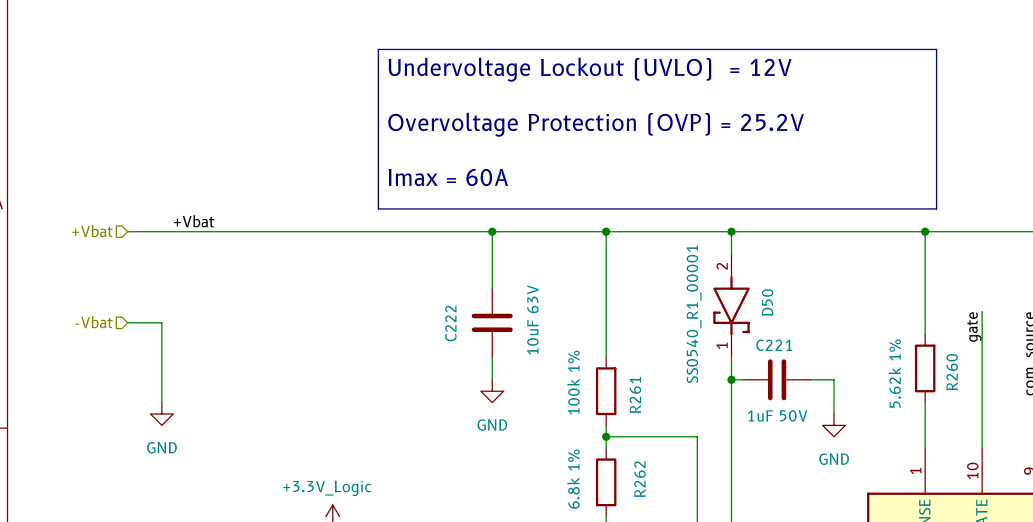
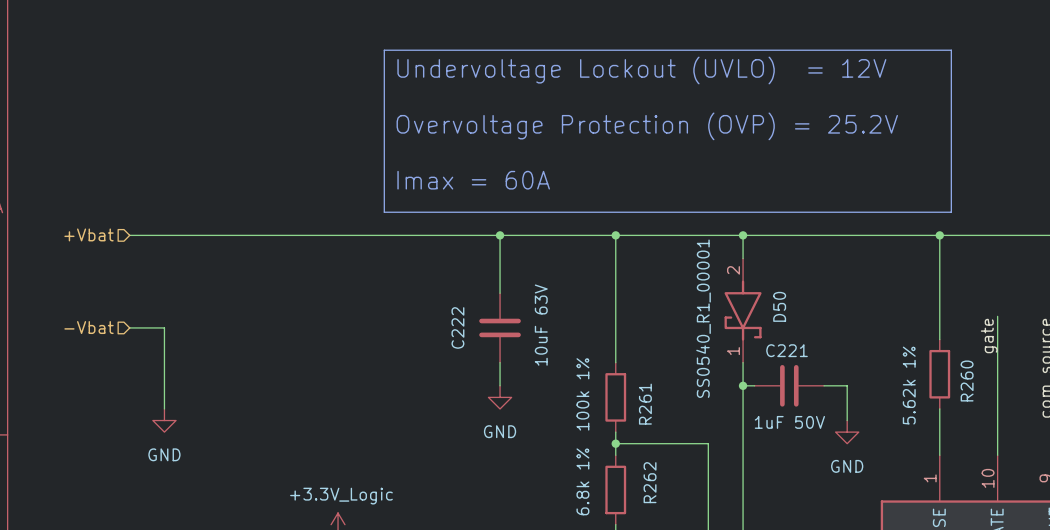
label: +Vbat (194, 221) -> none

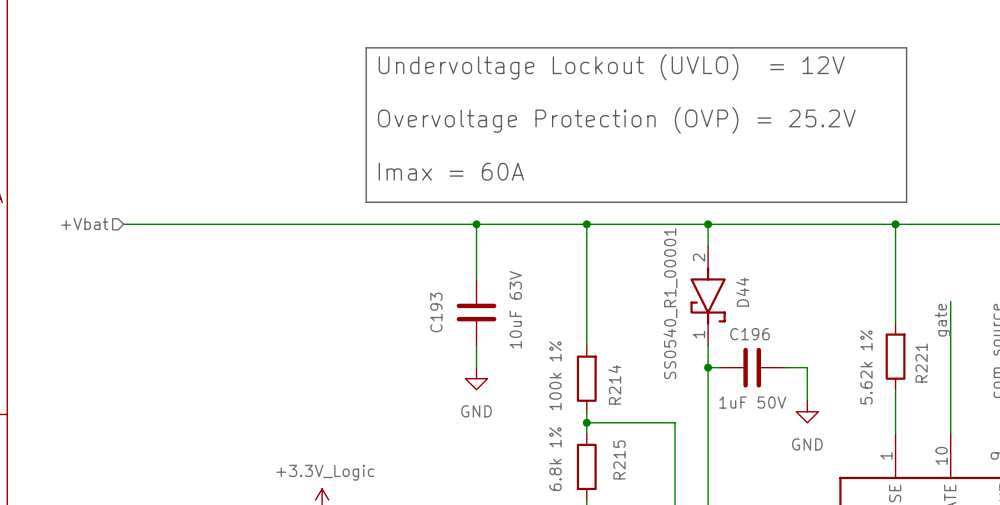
D50 name: D50 (779, 306) -> D44 (742, 292)
hierarchical label: -Vbat (89, 327) -> none
wire: (129, 327) (164, 327) (164, 408) -> none
C222 name: C222 (457, 327) -> C193 (436, 312)
C221 name: C221 (787, 350) -> C196 (749, 334)
R260 name: R260 (967, 381) -> R221 (921, 363)
R261 name: R261 (645, 404) -> R214 (614, 384)
power symbol: GND (164, 420) -> none
R262 name: R262 (650, 482) -> R215 (619, 459)

